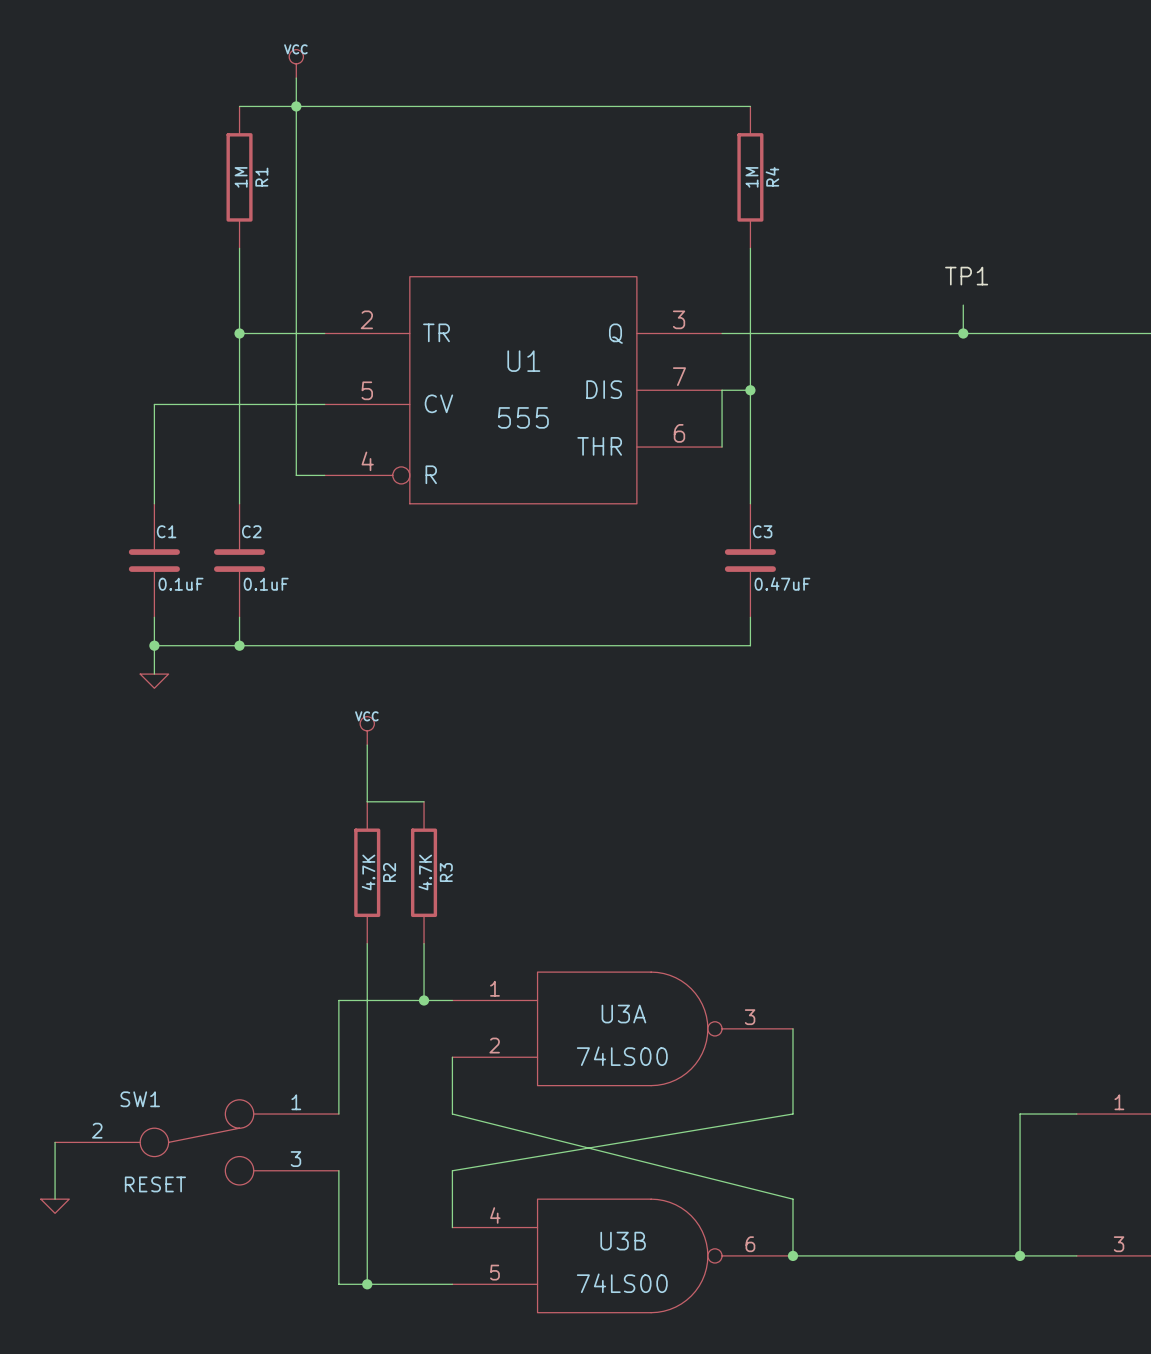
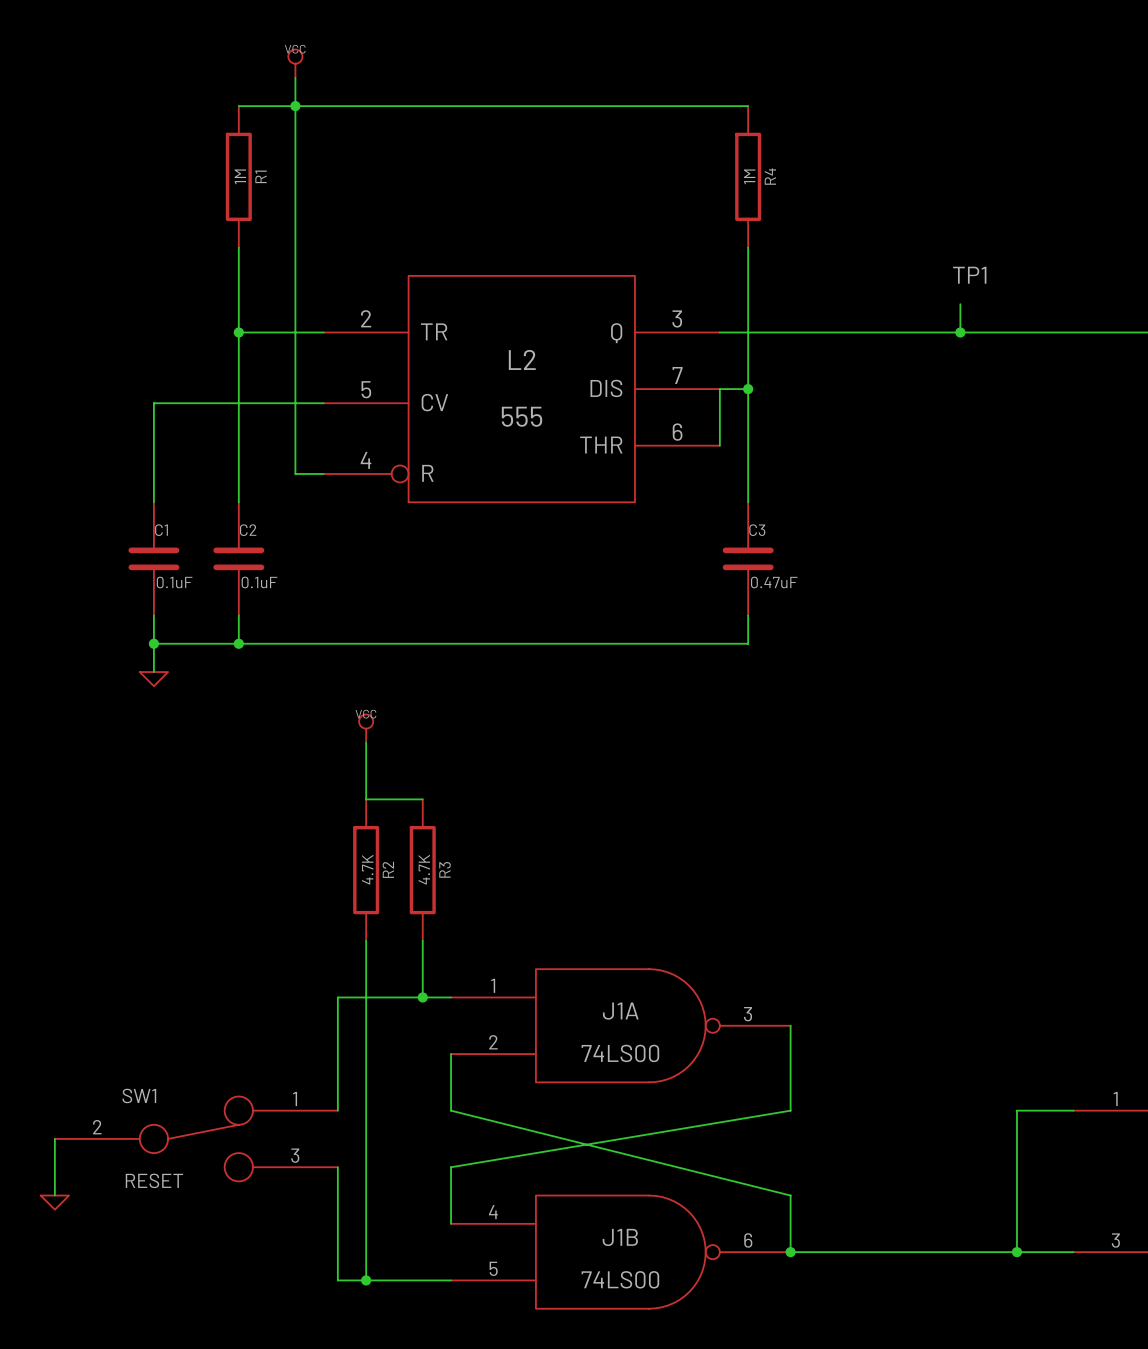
U1 name: U1 (523, 361) -> L2 (522, 359)
U3A name: U3A (623, 1014) -> J1A (620, 1011)
U3B name: U3B (623, 1241) -> J1B (620, 1237)

